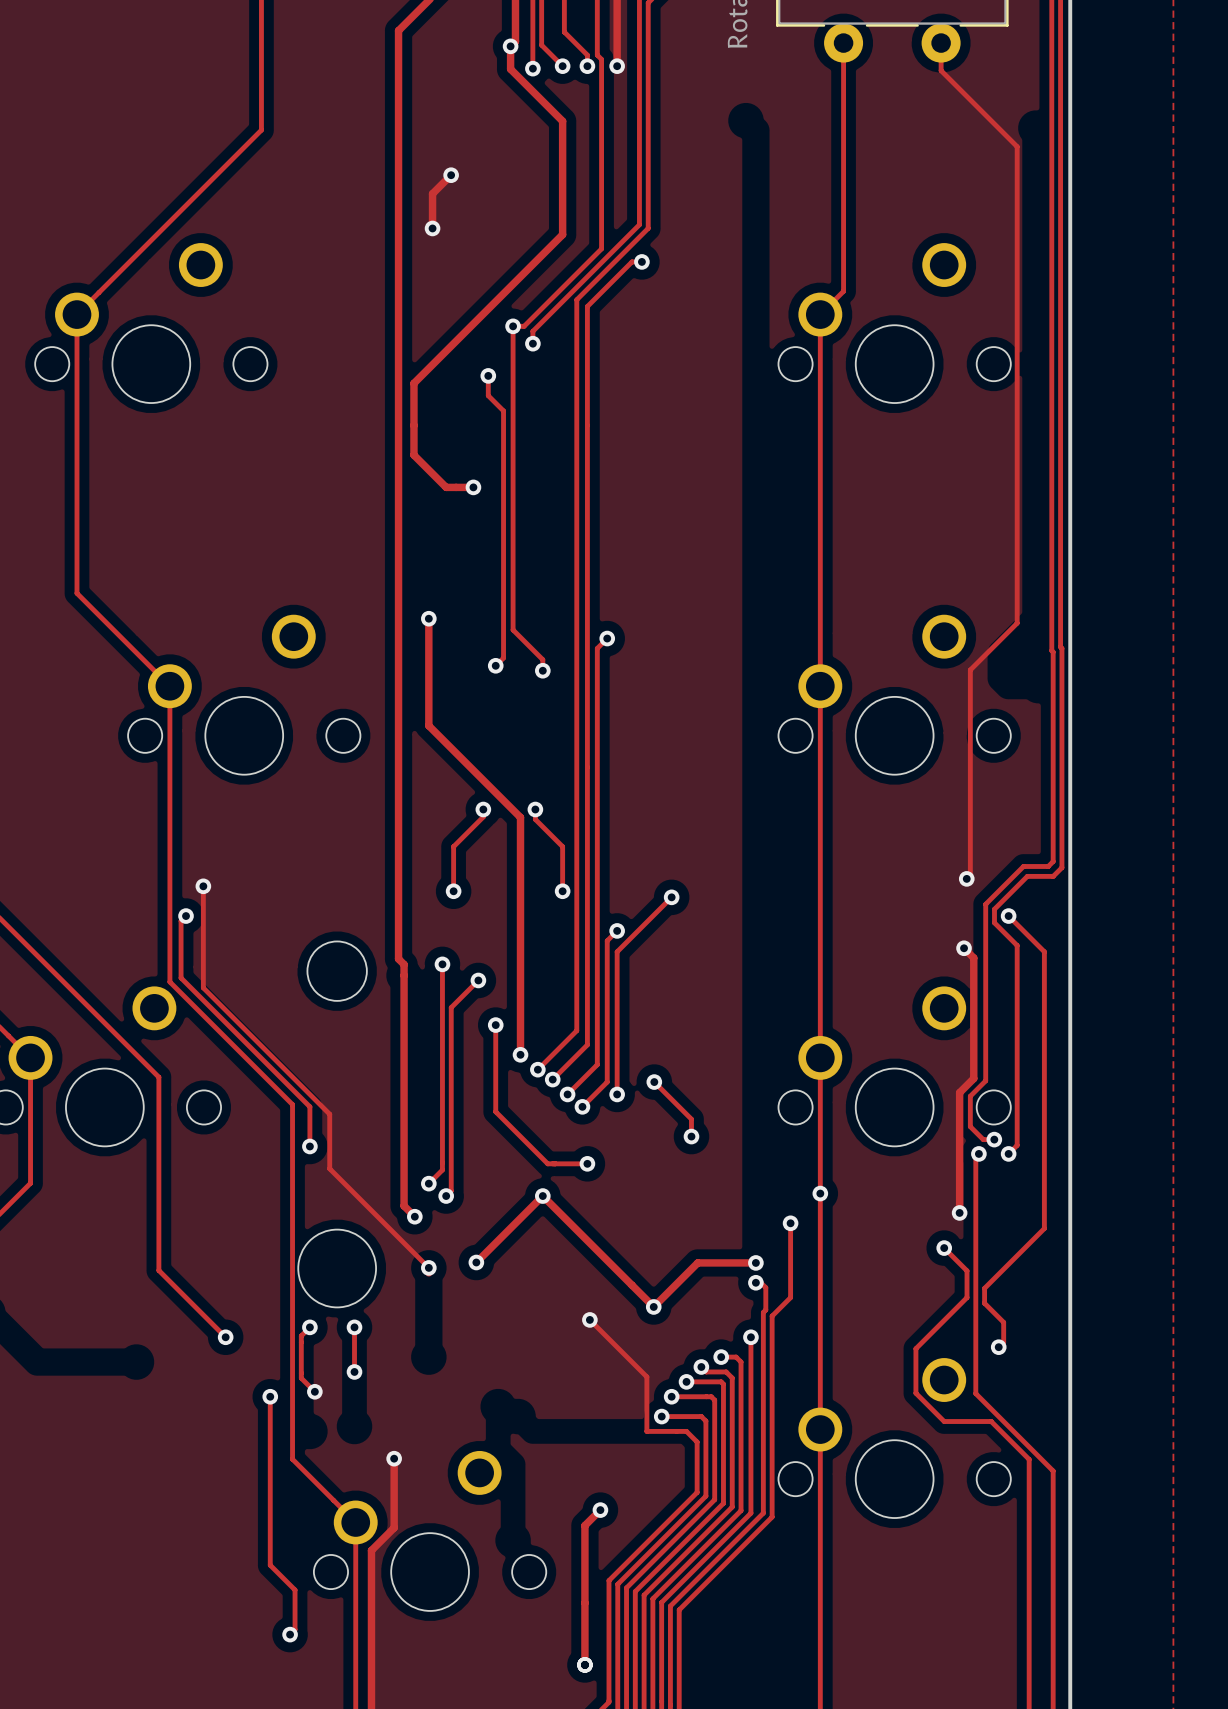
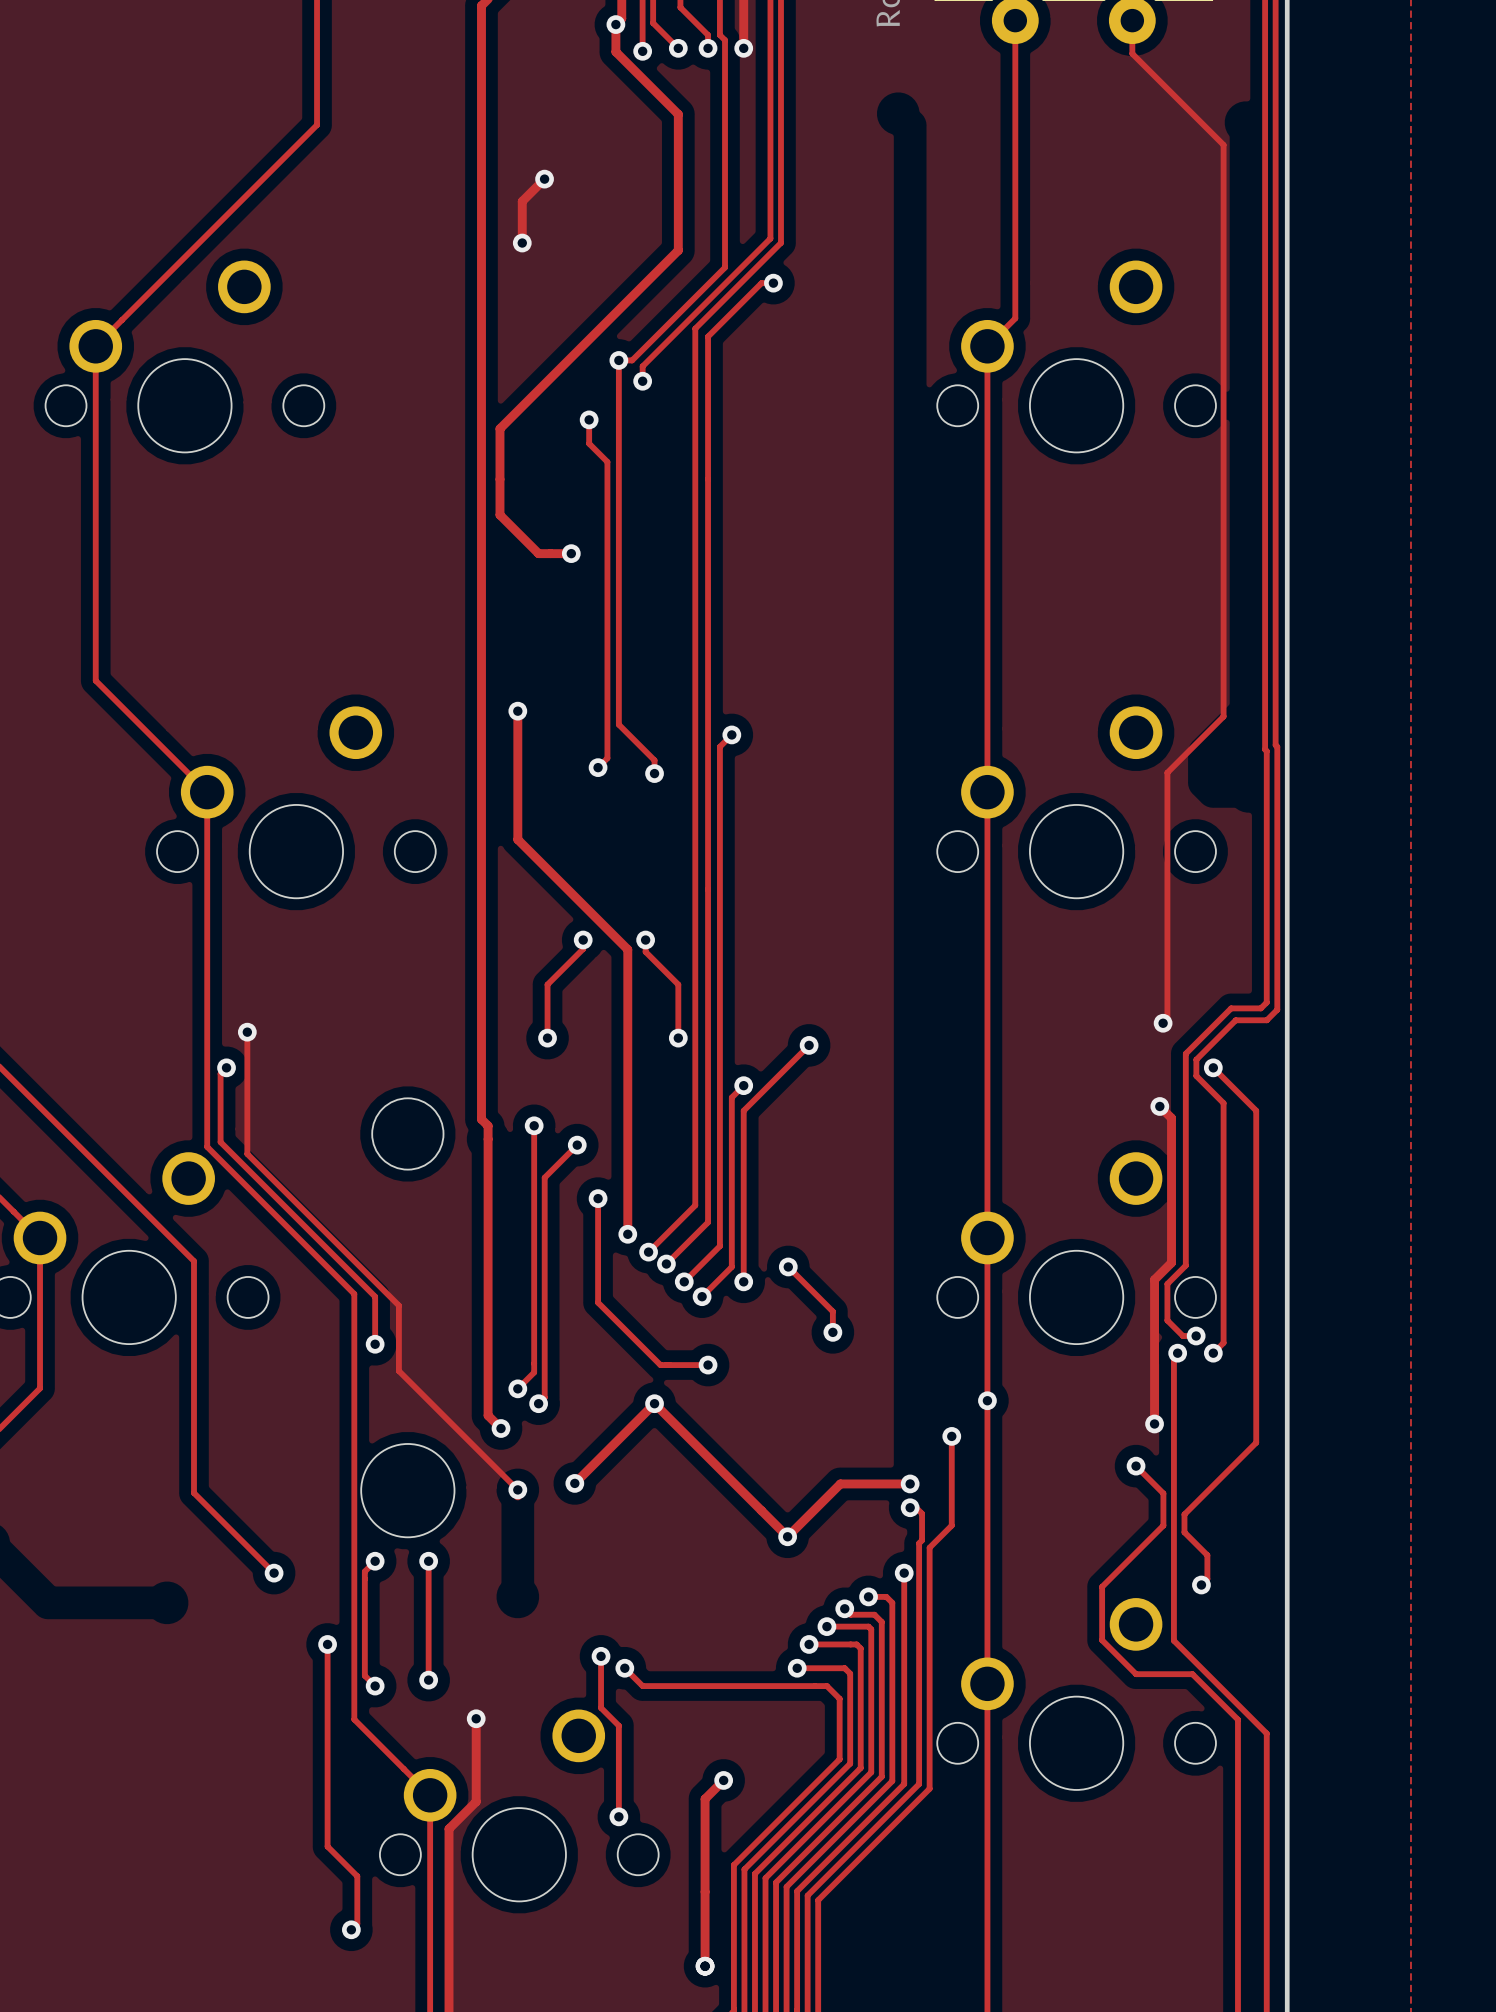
track: (589, 1319) (646, 1376) (646, 1431) -> (624, 1668) (642, 1686) (779, 1686)
via: (589, 1319) -> none
track: none -> (428, 1614) (428, 1680)
via: (354, 1371) -> none
track: (301, 1378) (314, 1391) -> (364, 1622) (364, 1675) (375, 1686)
via: (314, 1391) -> none
track: none -> (601, 1656) (601, 1707) (618, 1725) (618, 1816)
via: none -> (601, 1656)
via: none -> (624, 1668)
via: none -> (428, 1680)
via: none -> (375, 1686)
via: none -> (618, 1816)

